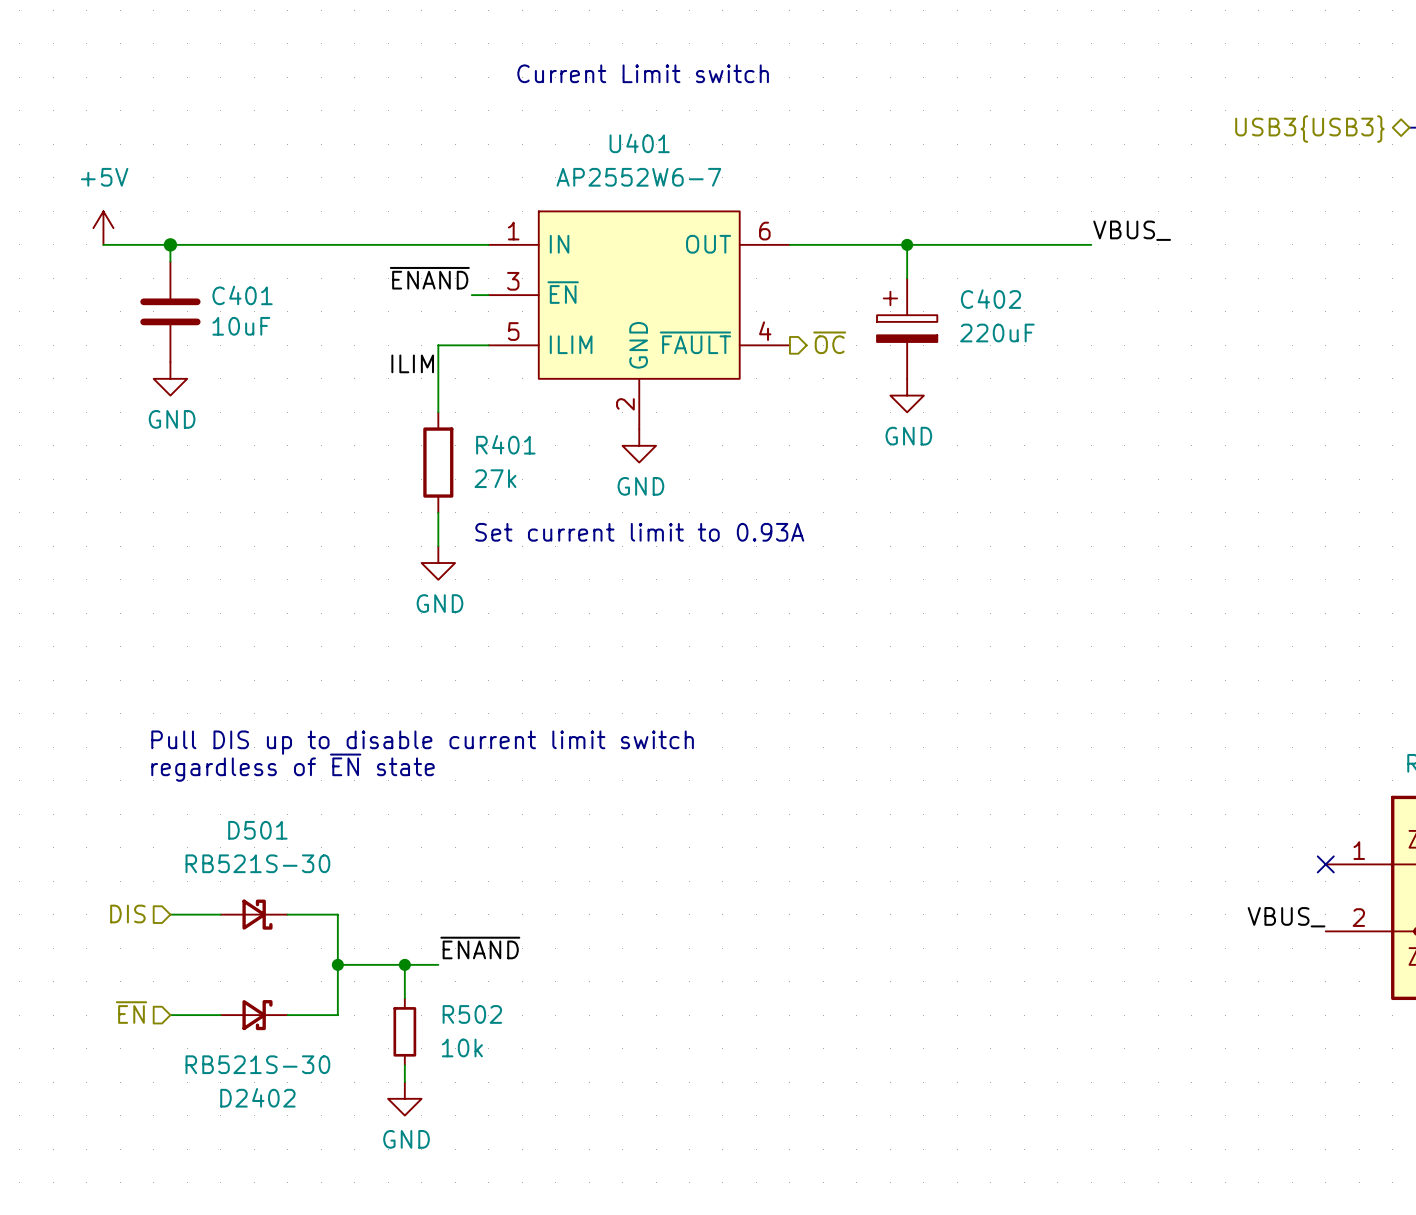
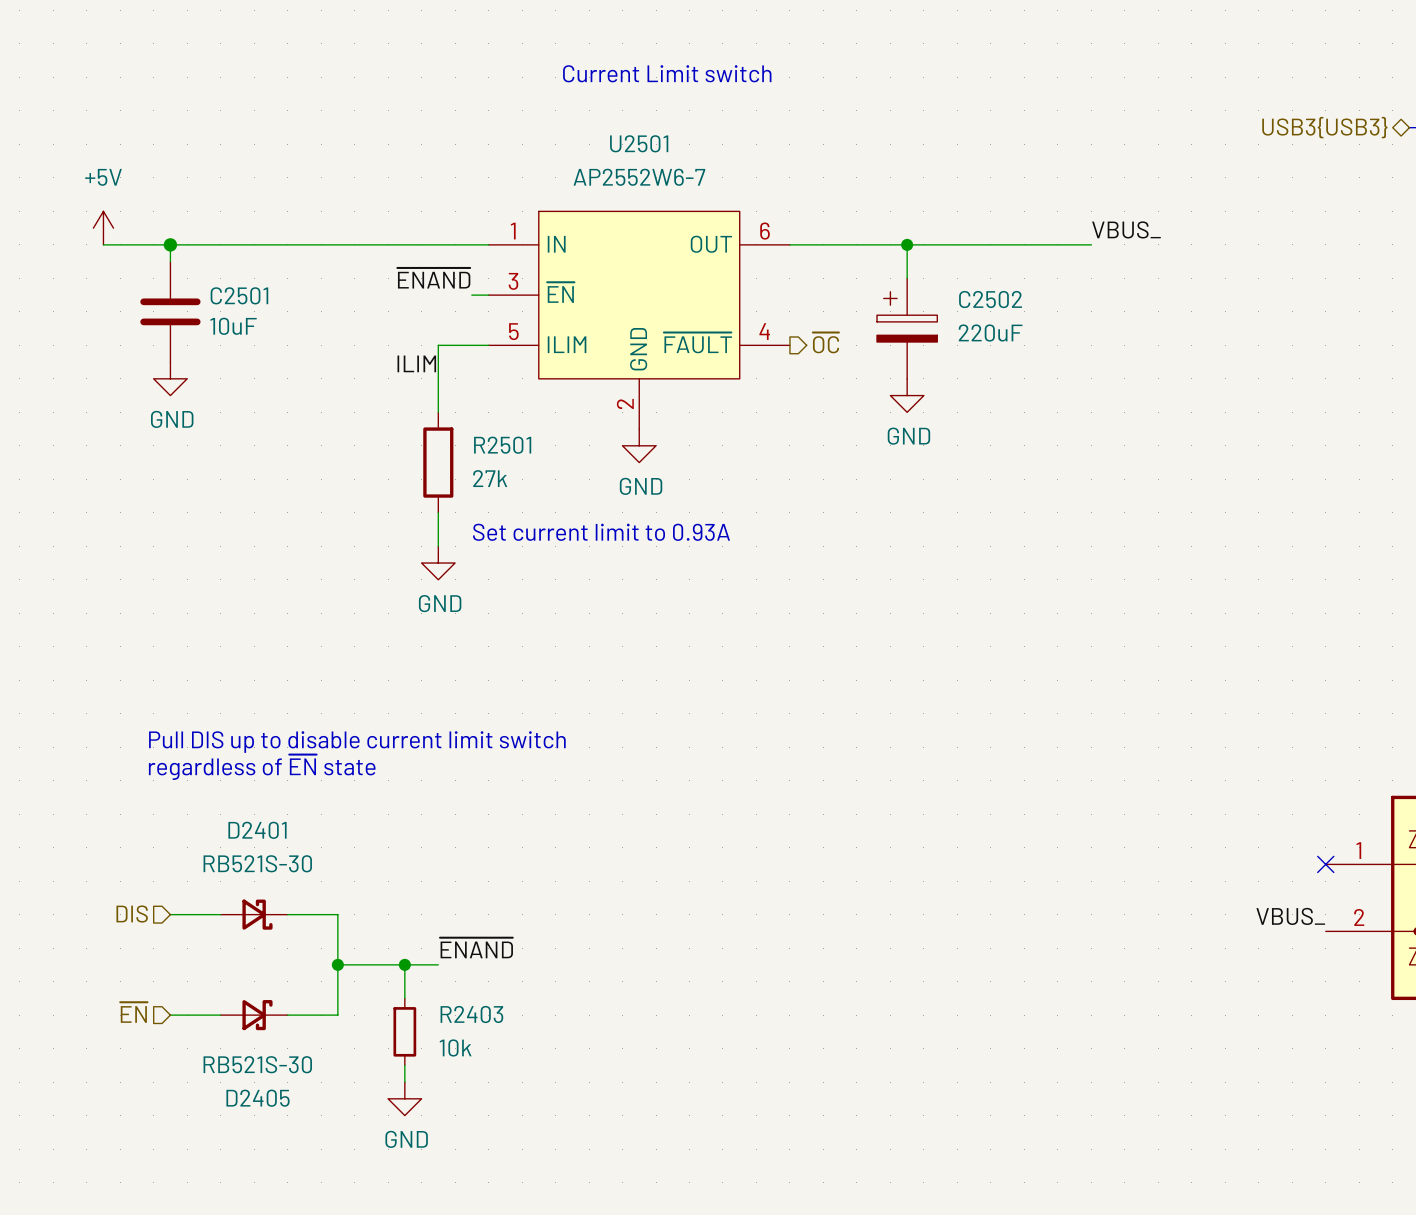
U401 name: U401 (639, 143) -> U2501 (639, 143)
C401 name: C401 (242, 295) -> C2501 (239, 295)
C402 name: C402 (991, 299) -> C2502 (990, 299)
R401 name: R401 (505, 444) -> R2501 (502, 445)
D501 name: D501 (257, 830) -> D2401 (257, 830)
R502 name: R502 (472, 1014) -> R2403 (471, 1014)
D2402 name: D2402 (257, 1097) -> D2405 (258, 1098)

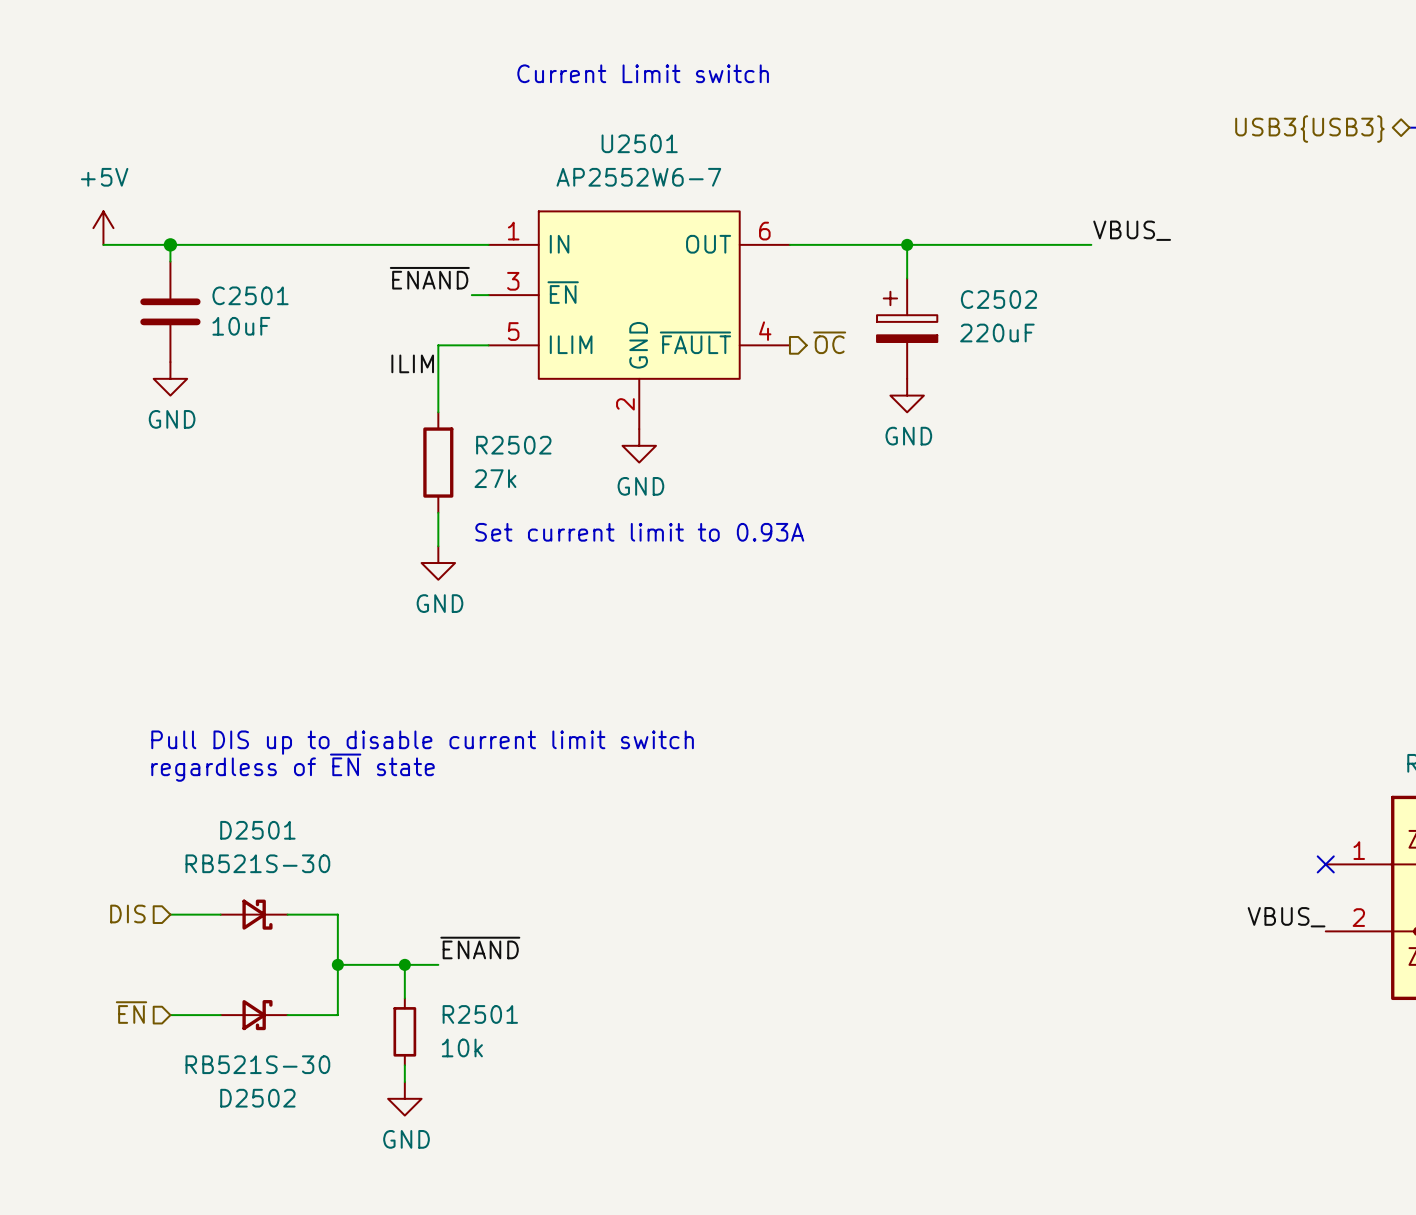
R2501 name: R2501 (502, 445) -> R2502 (513, 445)
D2401 name: D2401 (257, 830) -> D2501 (257, 830)
R2403 name: R2403 (471, 1014) -> R2501 (480, 1014)
D2405 name: D2405 (258, 1098) -> D2502 (257, 1098)

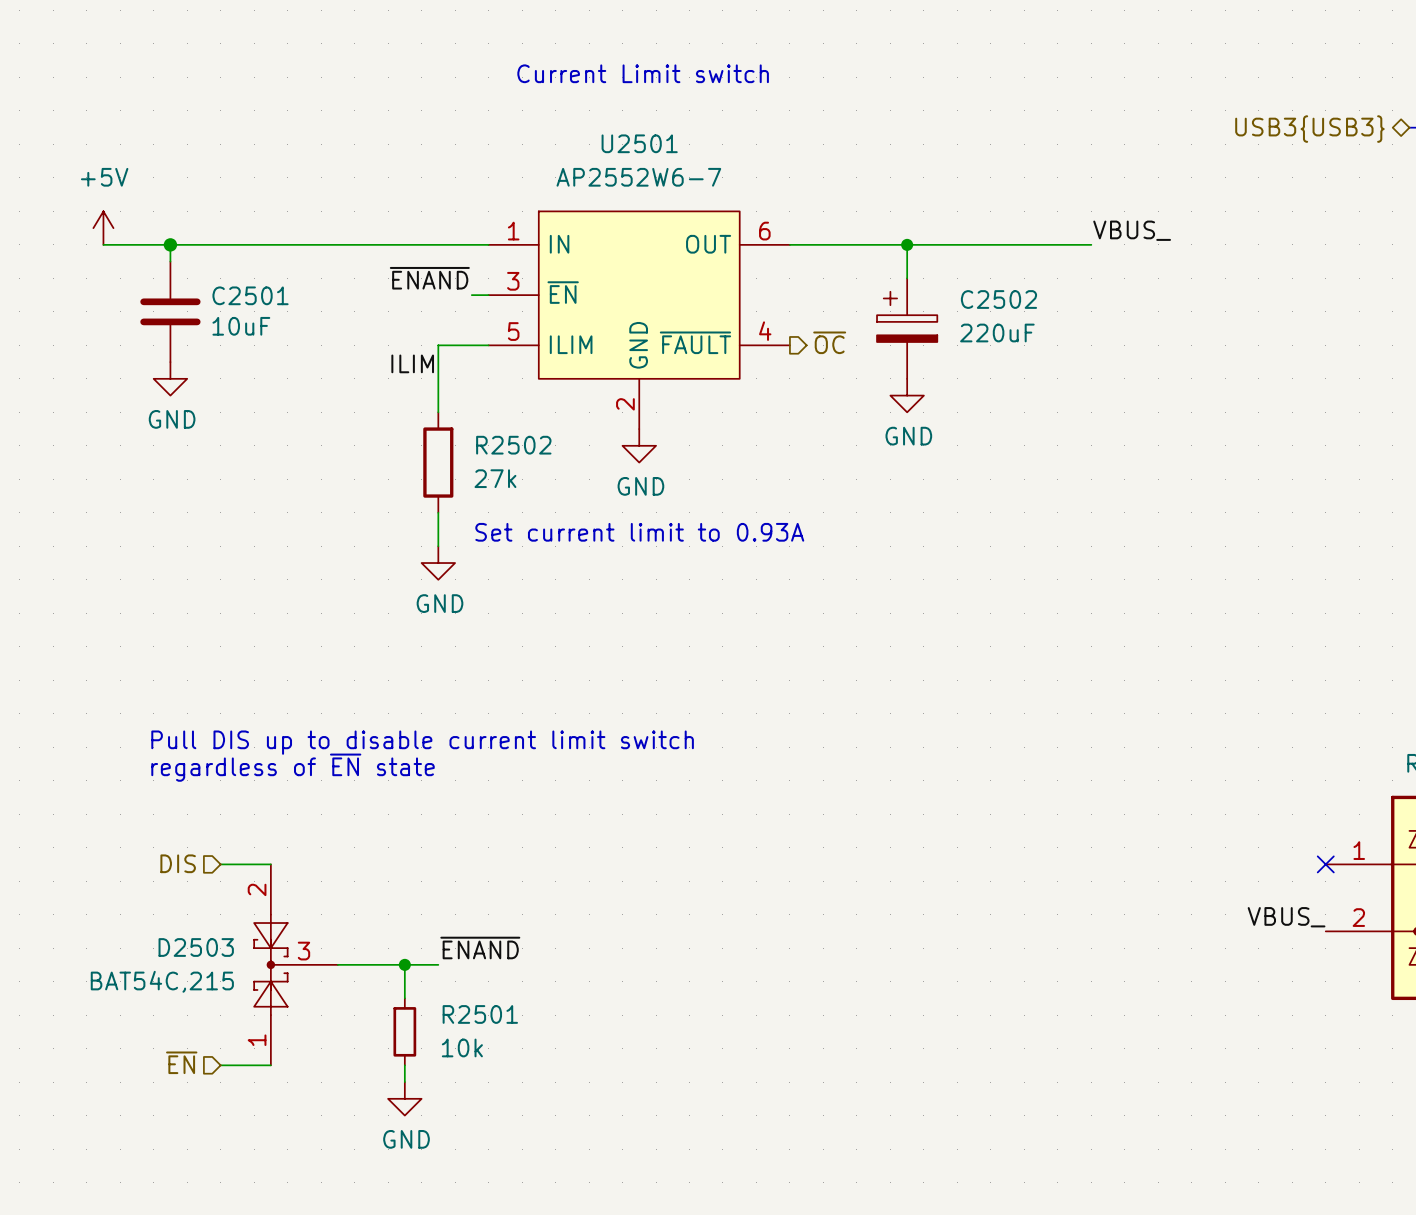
hierarchical label position: DIS (127, 914) -> DIS (178, 863)
wire: (170, 914) (220, 914) -> (220, 864) (270, 864)
D2501: RB521S-30 (254, 914) -> none
wire: (287, 914) (337, 914) (337, 1015) (287, 1015) -> none
D2503: none -> BAT54C,215 (296, 964)
junction: (337, 964) -> none
hierarchical label position: ~{EN} (131, 1012) -> ~{EN} (181, 1062)
wire: (170, 1015) (220, 1015) -> (220, 1065) (270, 1065)
D2502: RB521S-30 (254, 1015) -> none

